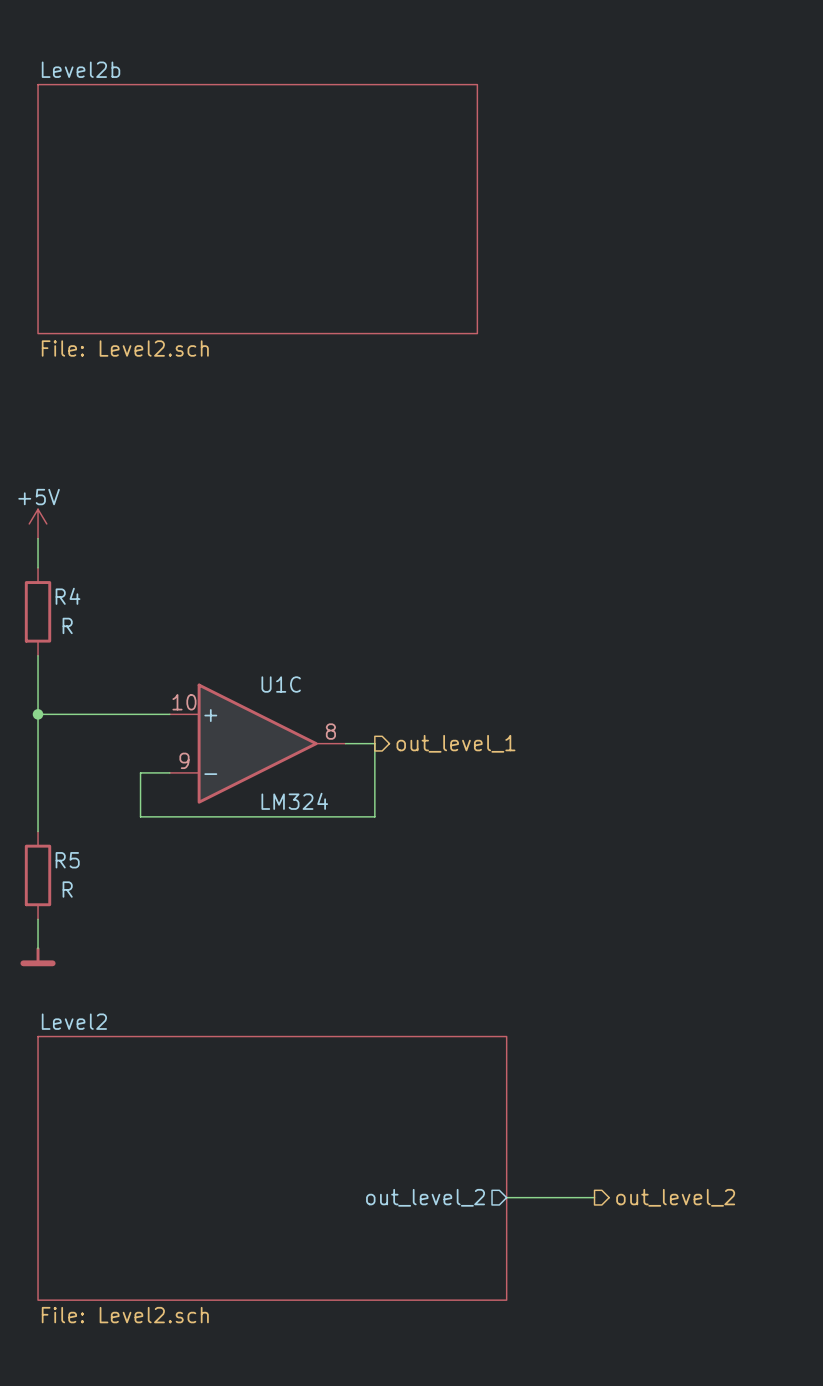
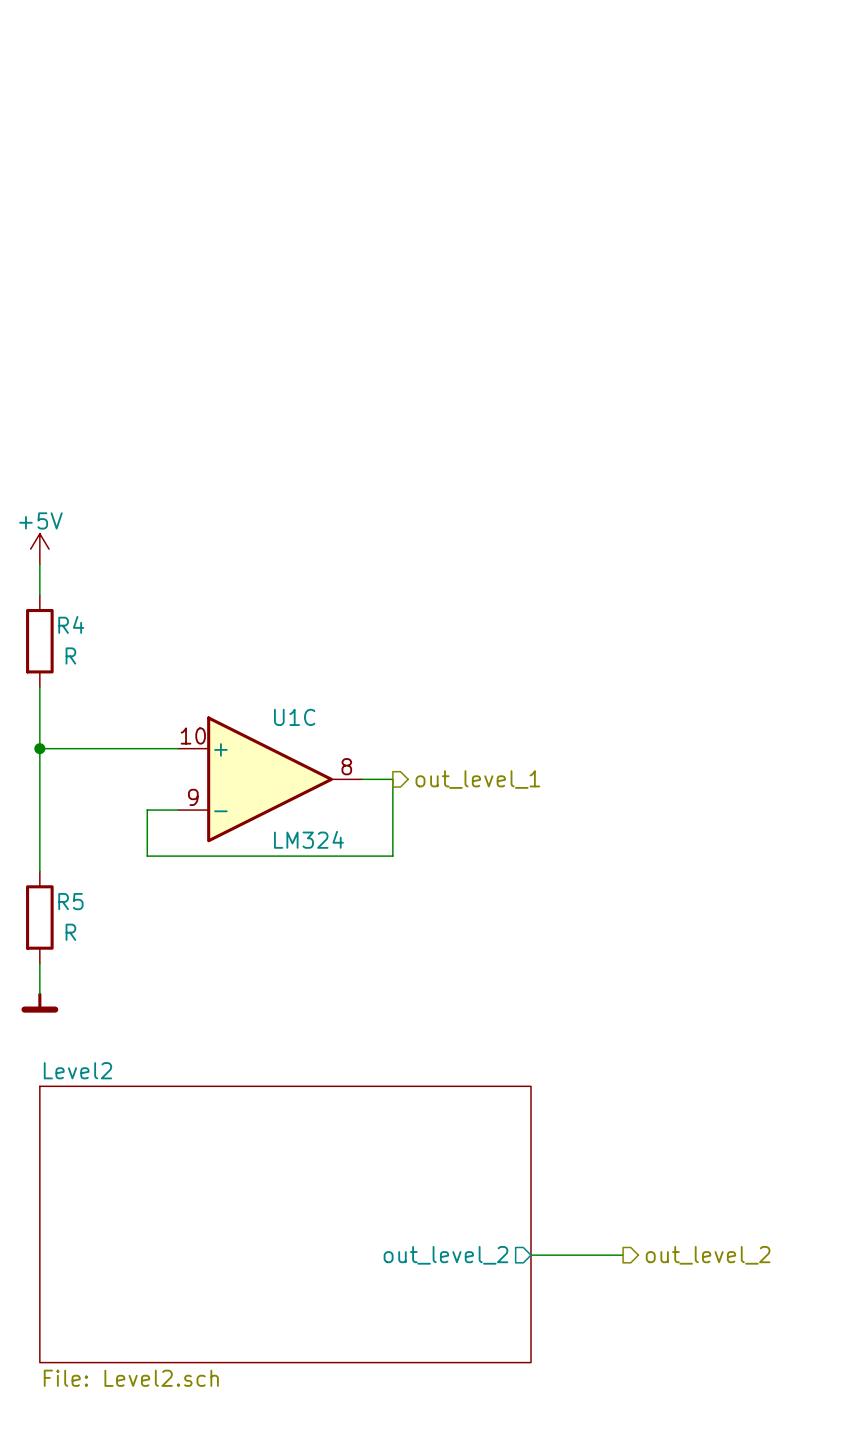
sheet Level2b: File: Level2.sch (257, 209) -> none

